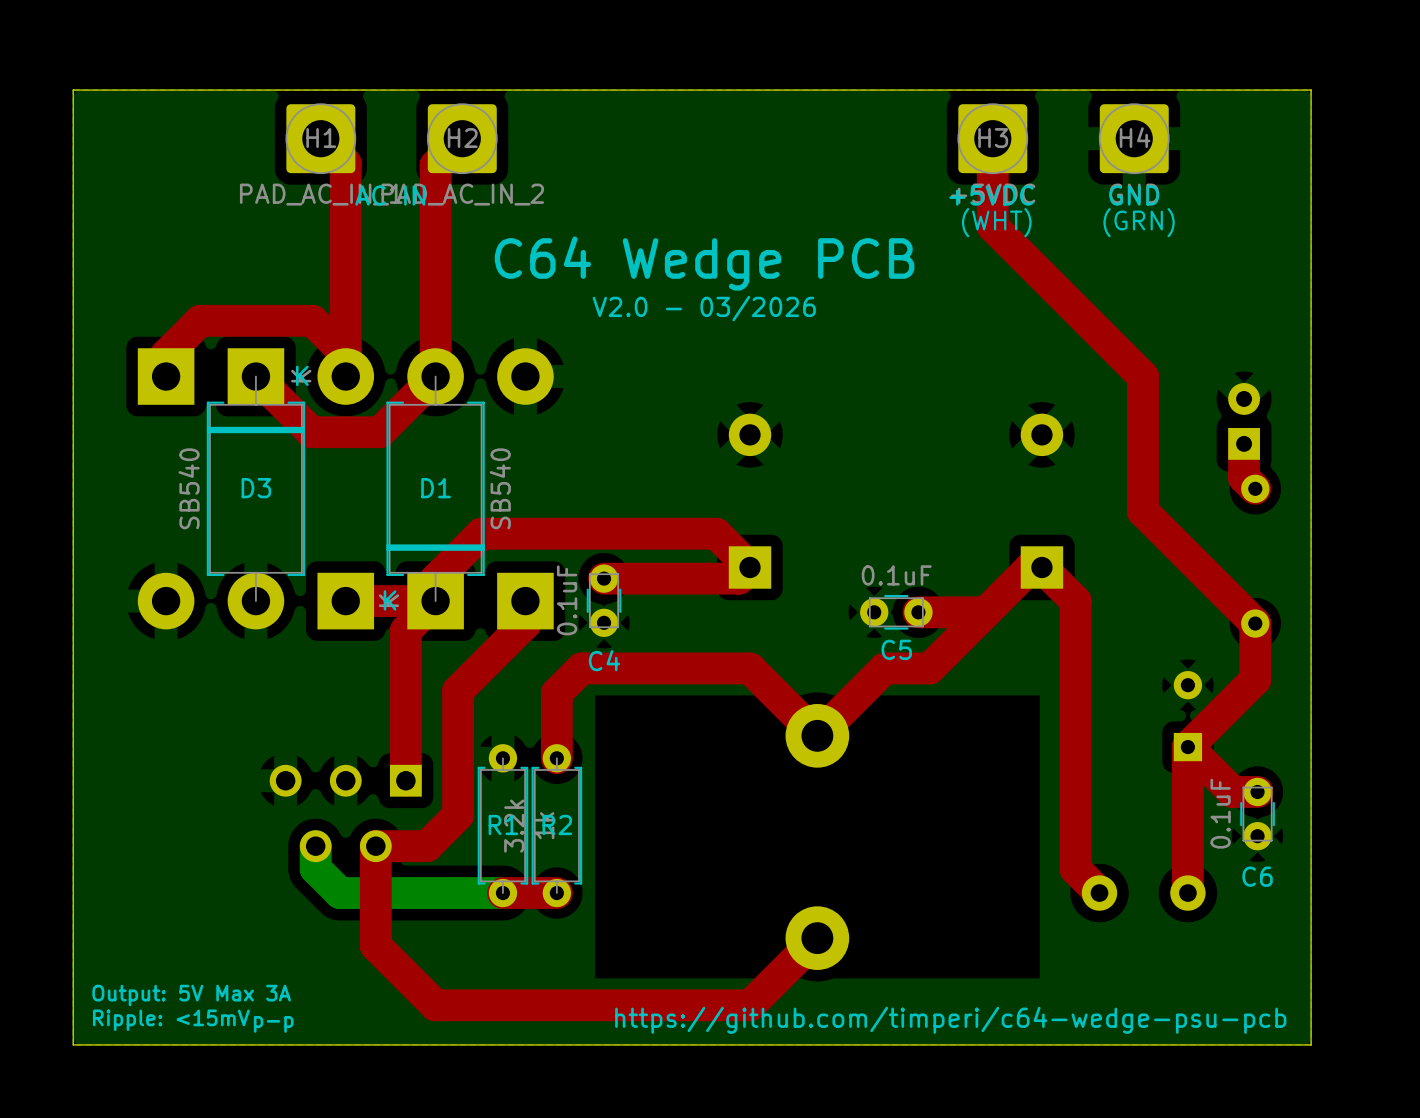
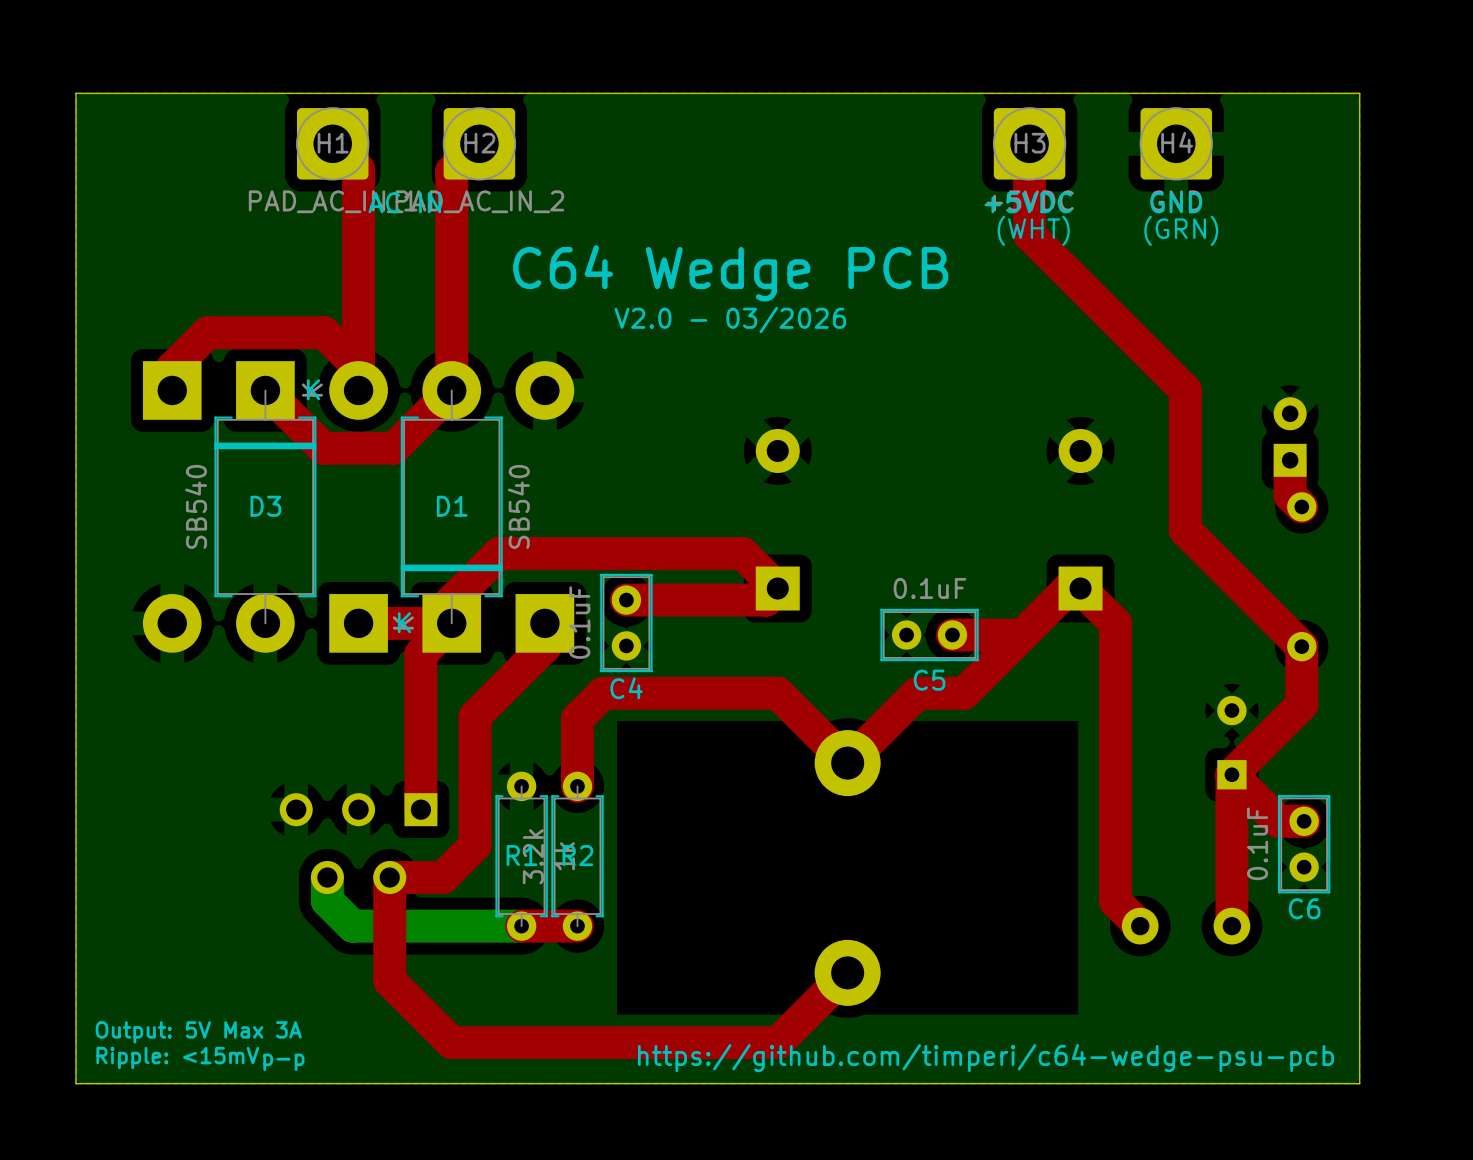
C4 footprint: [586, 564, 622, 637] -> [600, 573, 653, 673]
C5 footprint: [860, 594, 933, 630] -> [880, 608, 979, 662]
C6 footprint: [1240, 777, 1275, 851] -> [1277, 795, 1331, 894]

